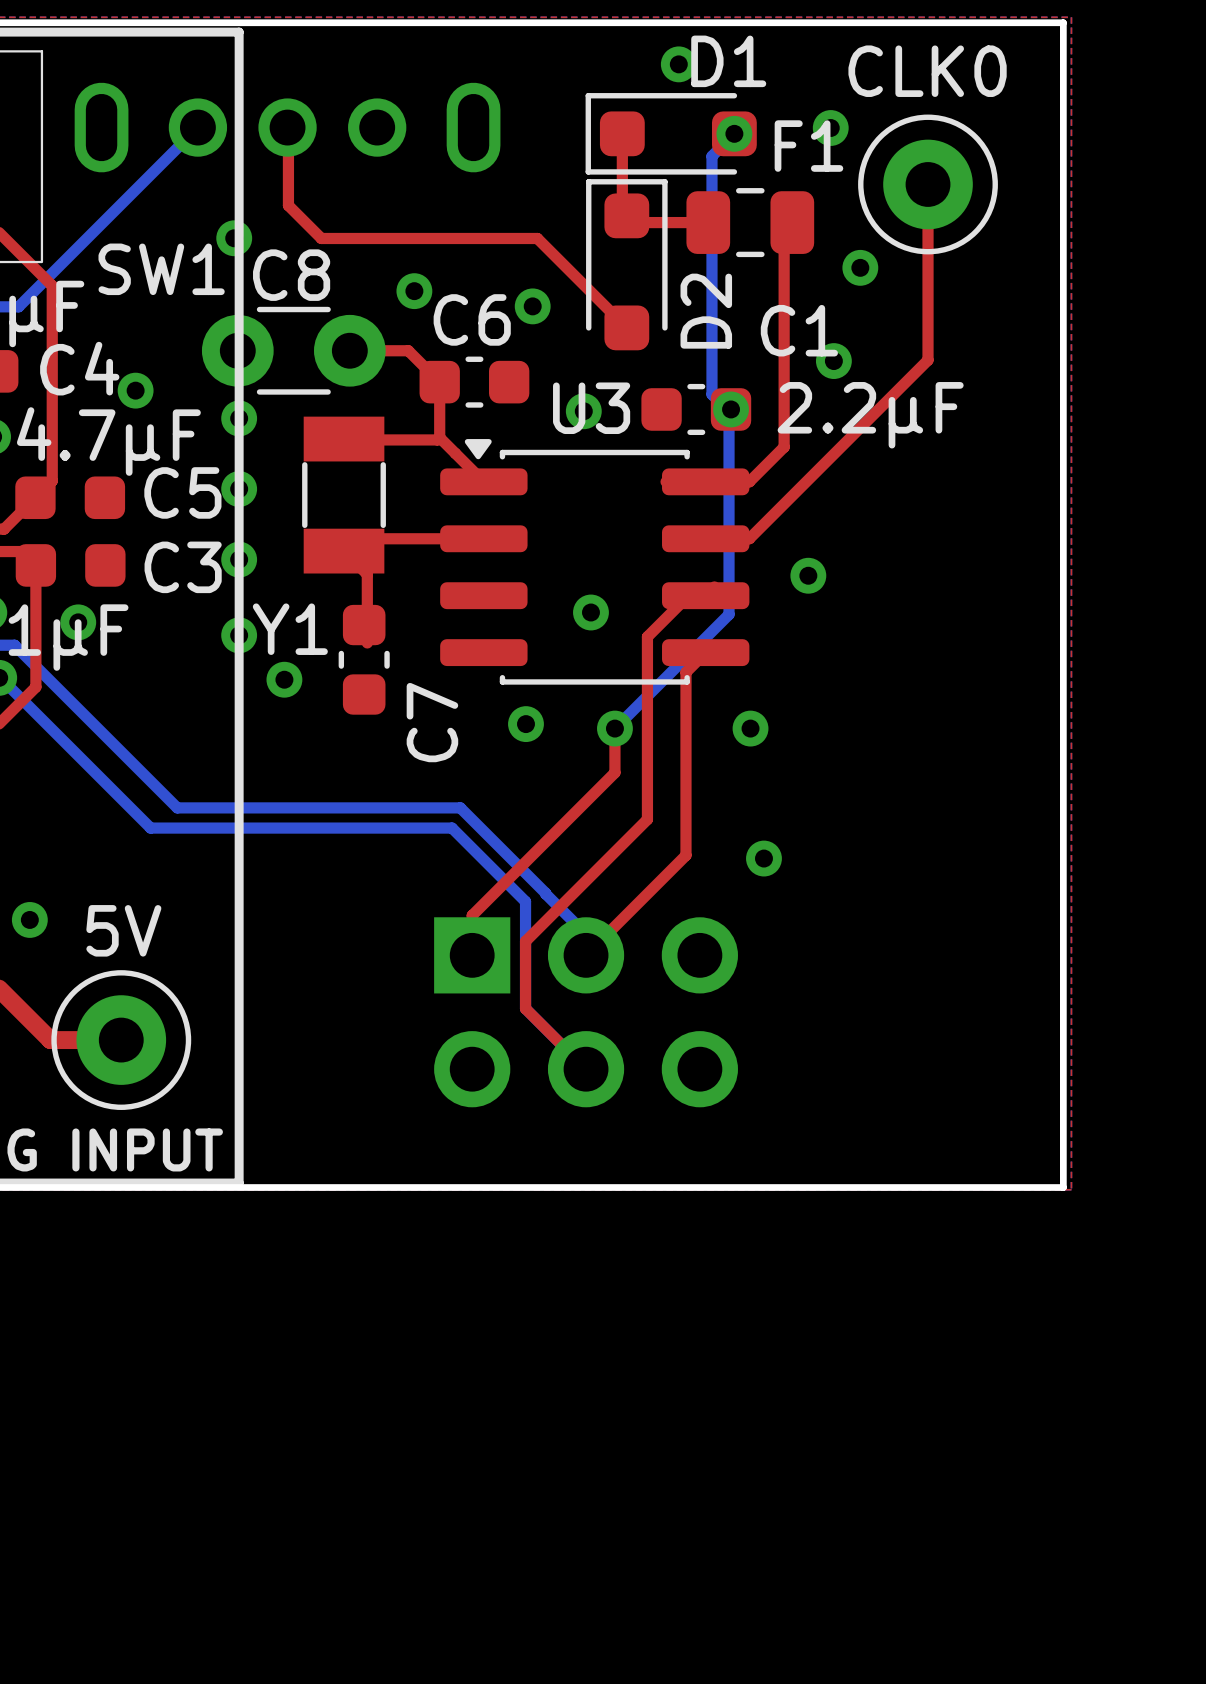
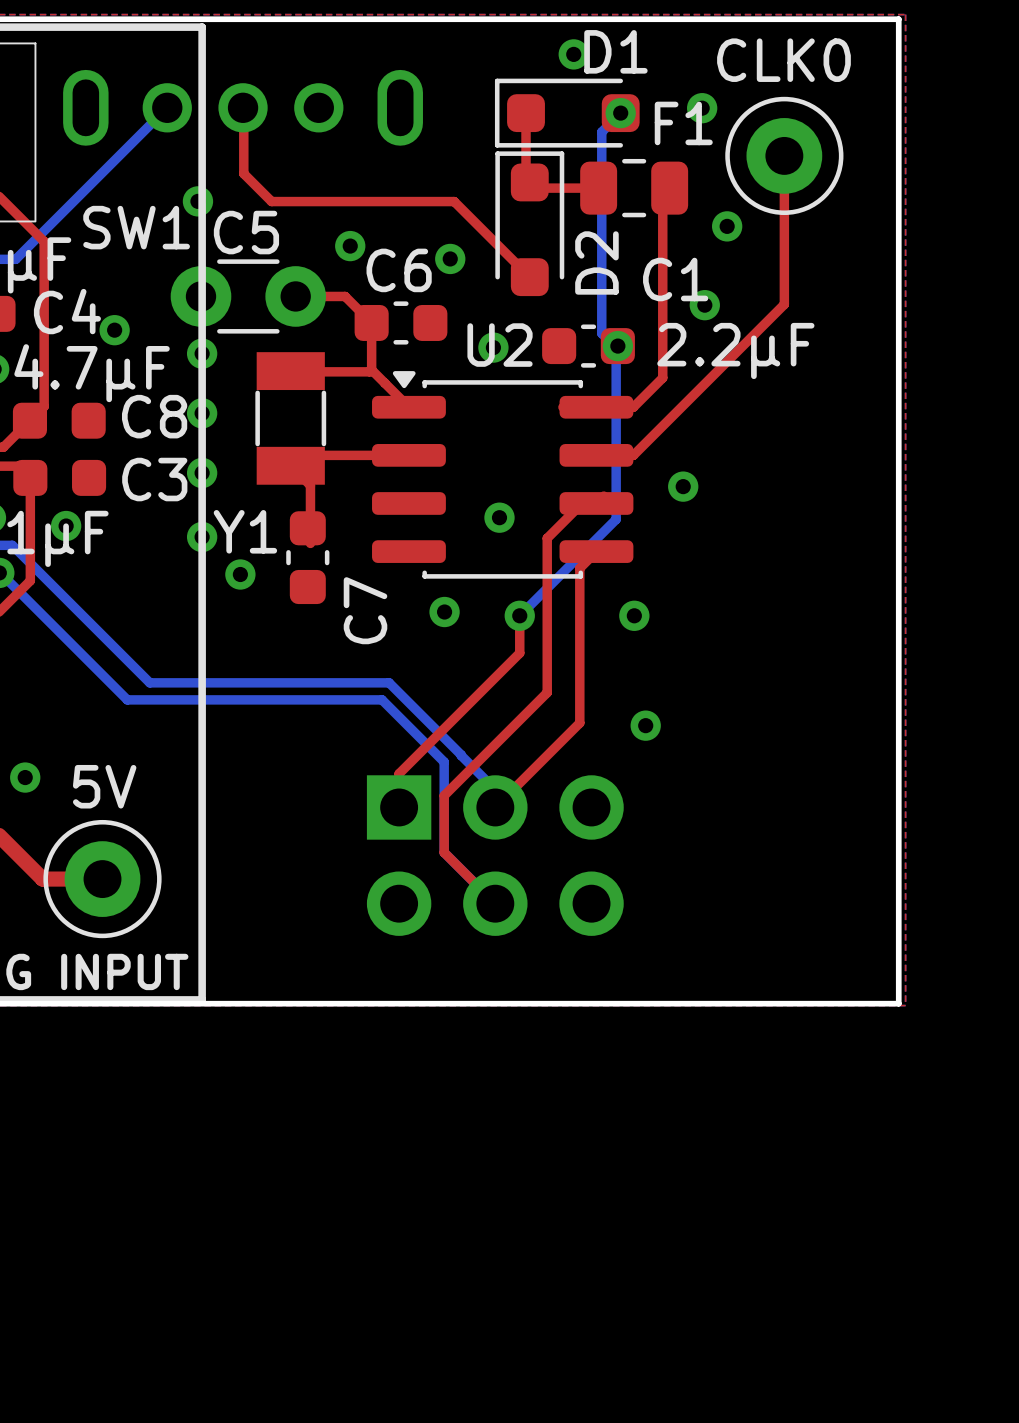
C8 name: C8 (291, 275) -> C5 (246, 232)
U3 name: U3 (591, 408) -> U2 (500, 345)
C5 name: C5 (182, 492) -> C8 (154, 416)

